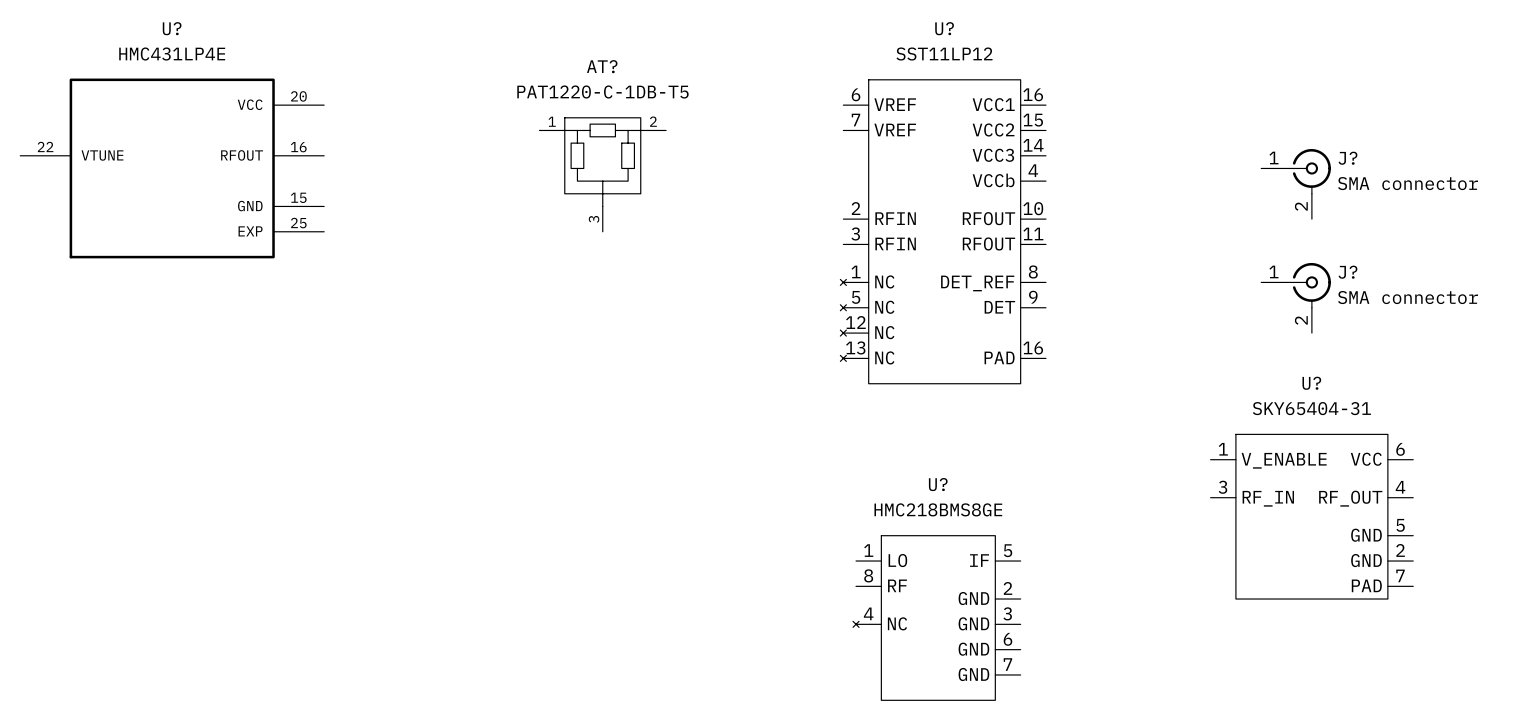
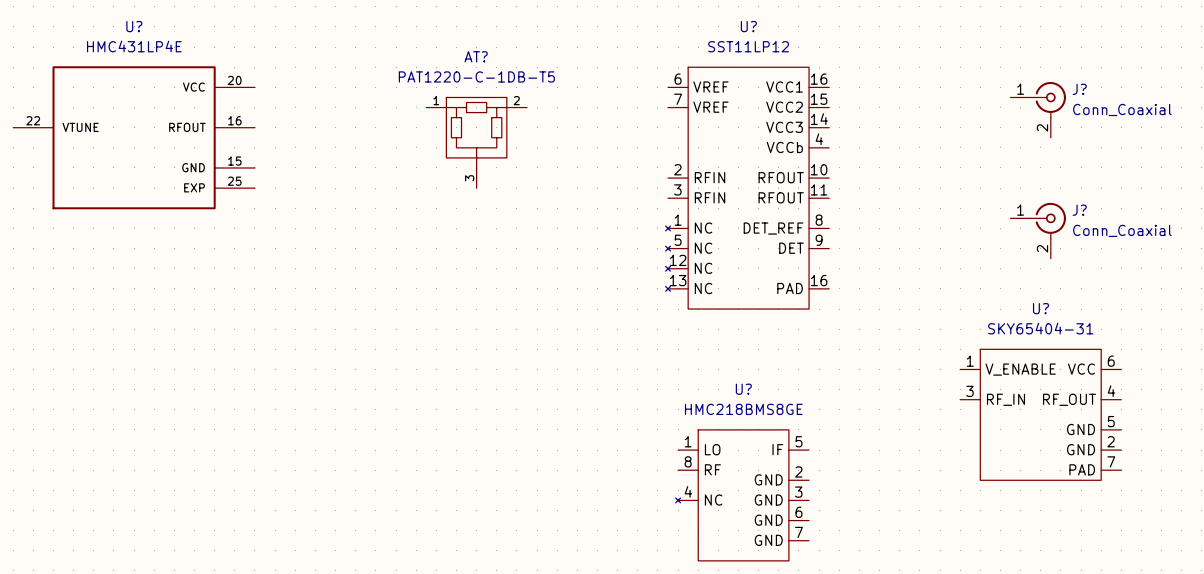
J?: none -> Conn_Coaxial (1038, 109)
J?: SMA connector (1296, 184) -> none
J?: none -> Conn_Coaxial (1038, 230)
J?: SMA connector (1296, 298) -> none

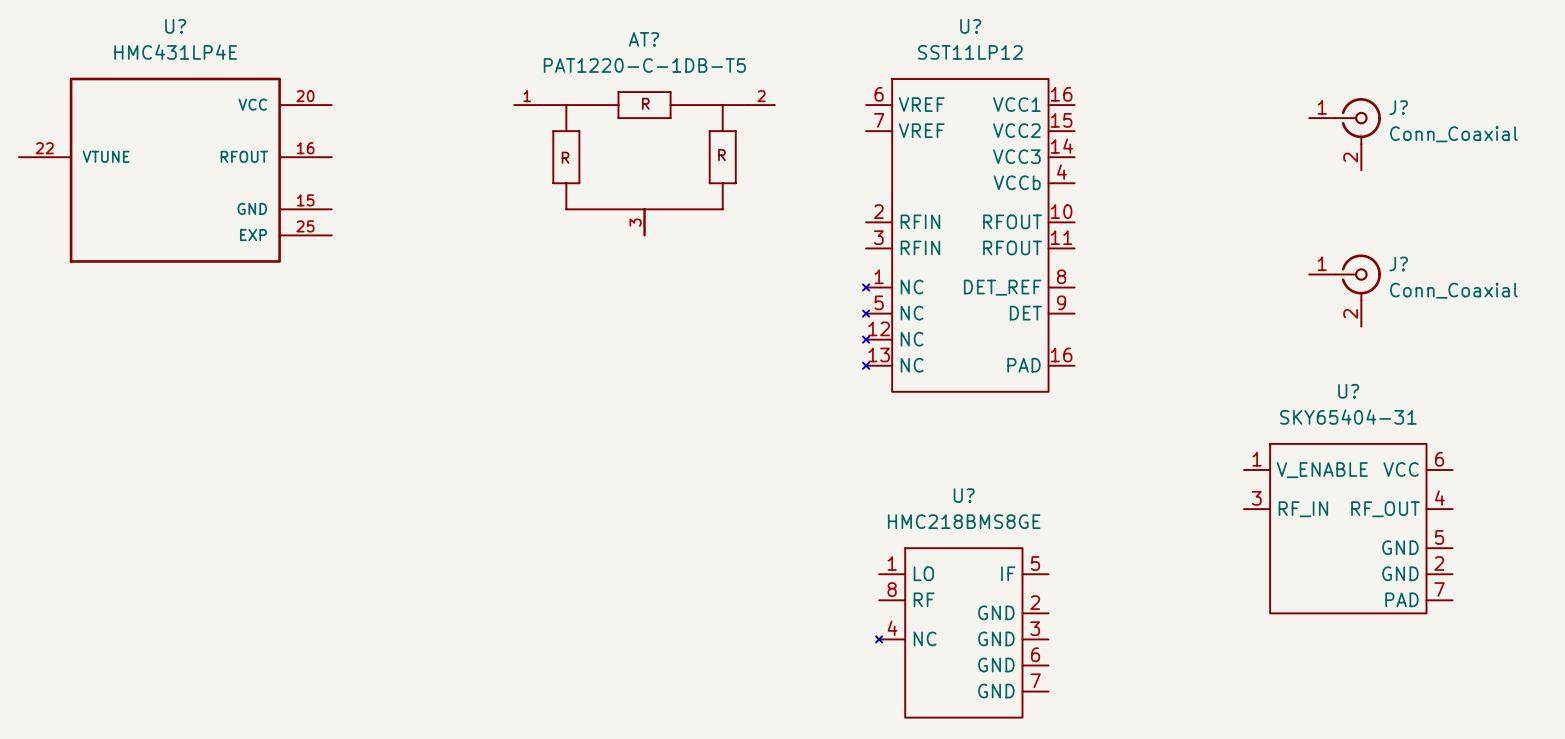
AT?: none -> PAT1220-C-1DB-T5 (644, 163)
AT?: PAT1220-C-1DB-T5 (476, 142) -> none

